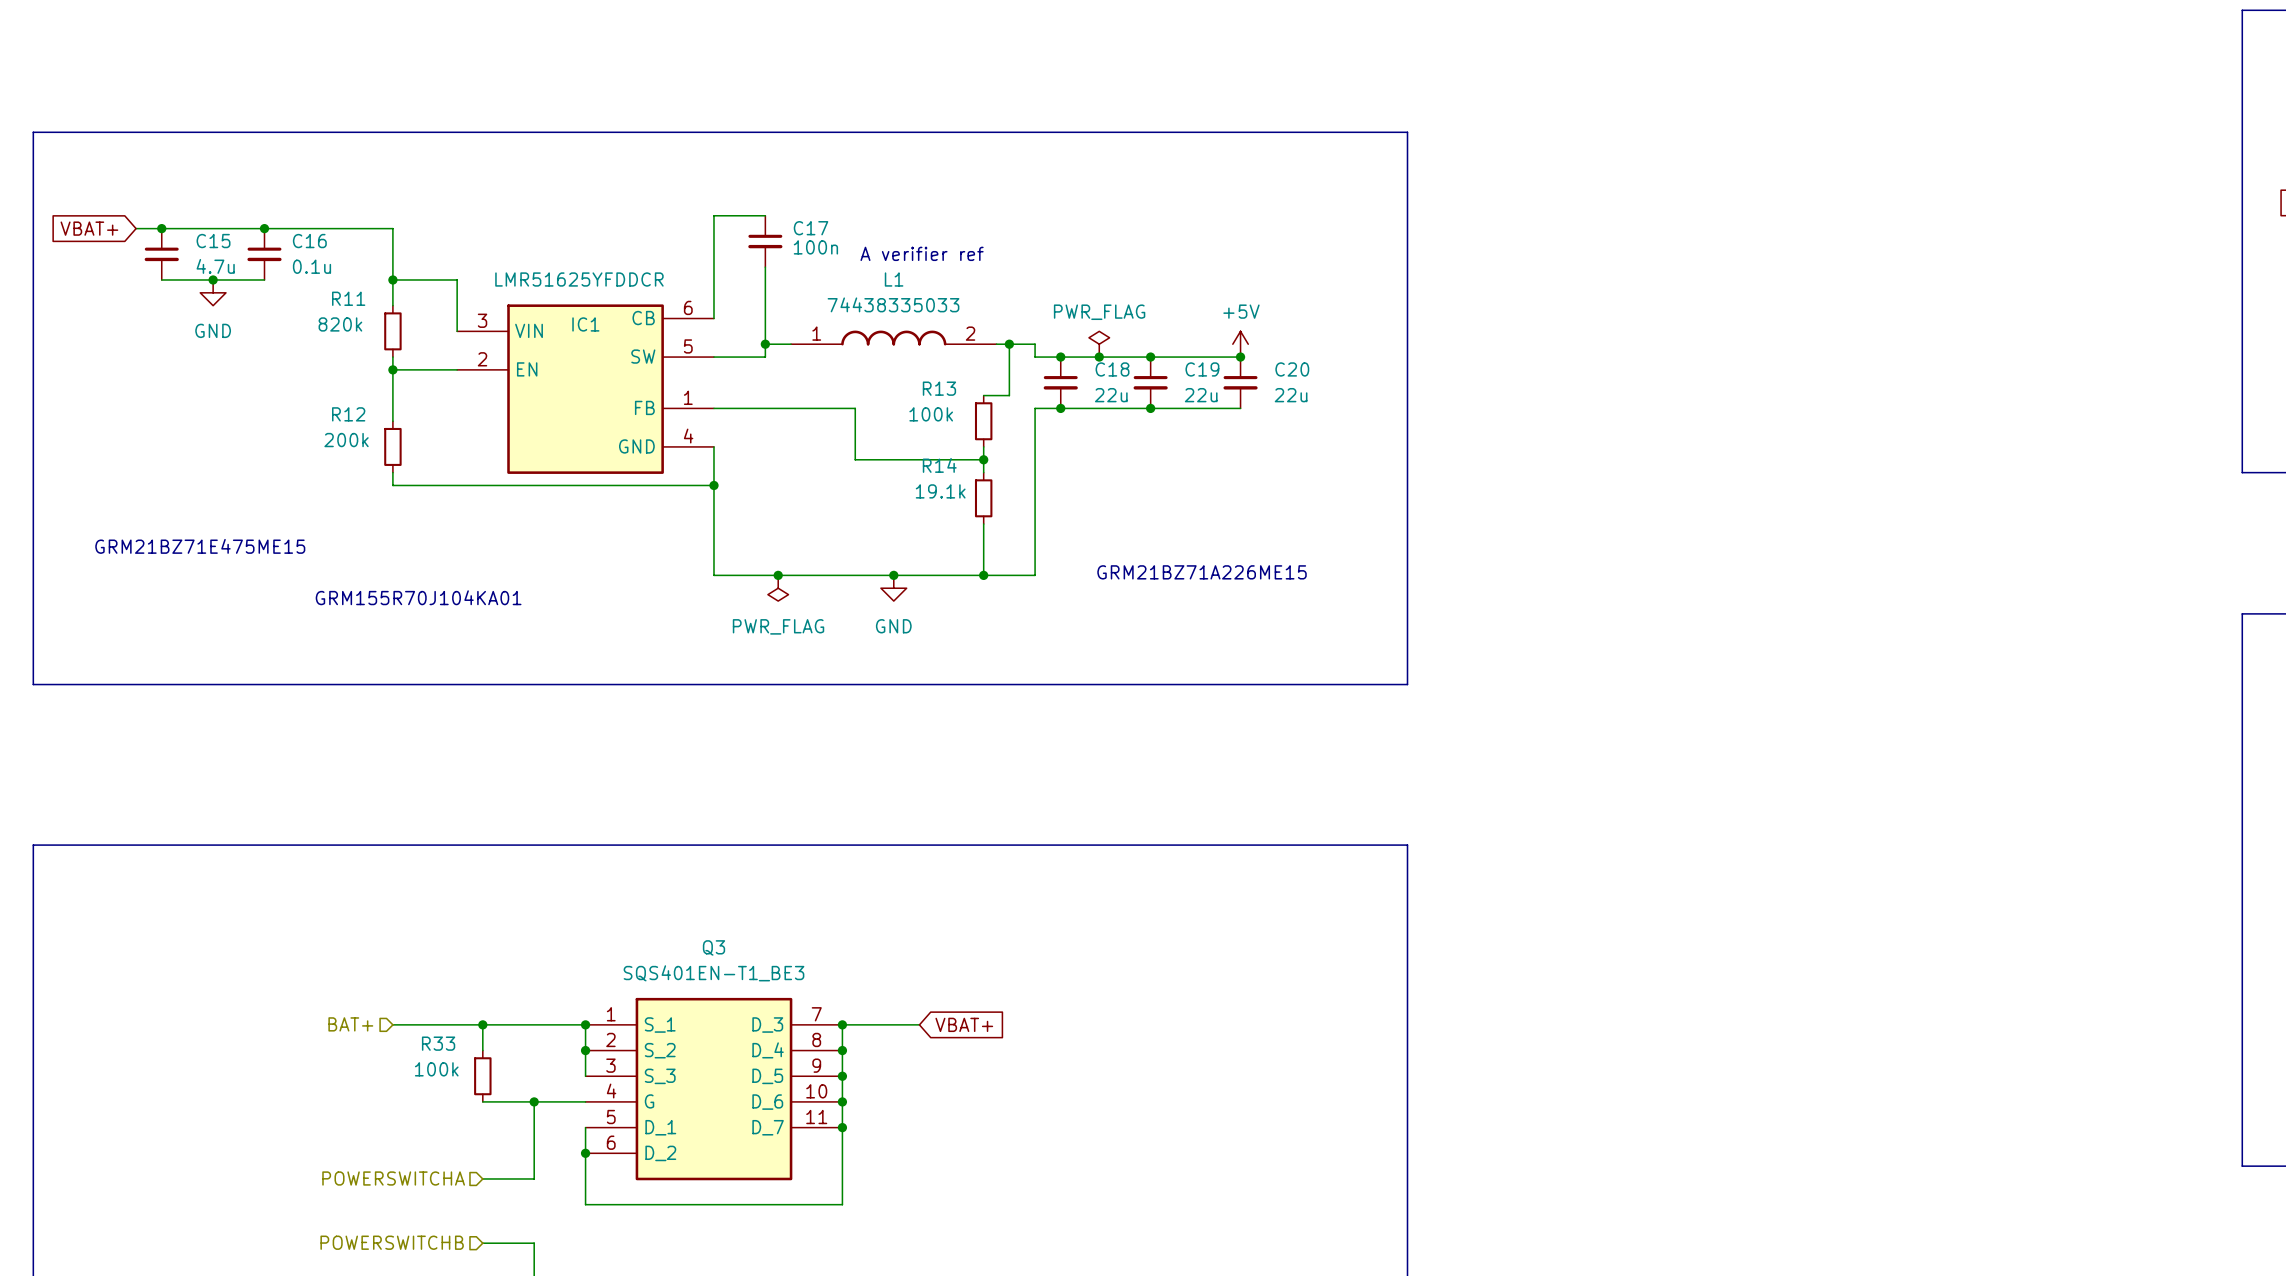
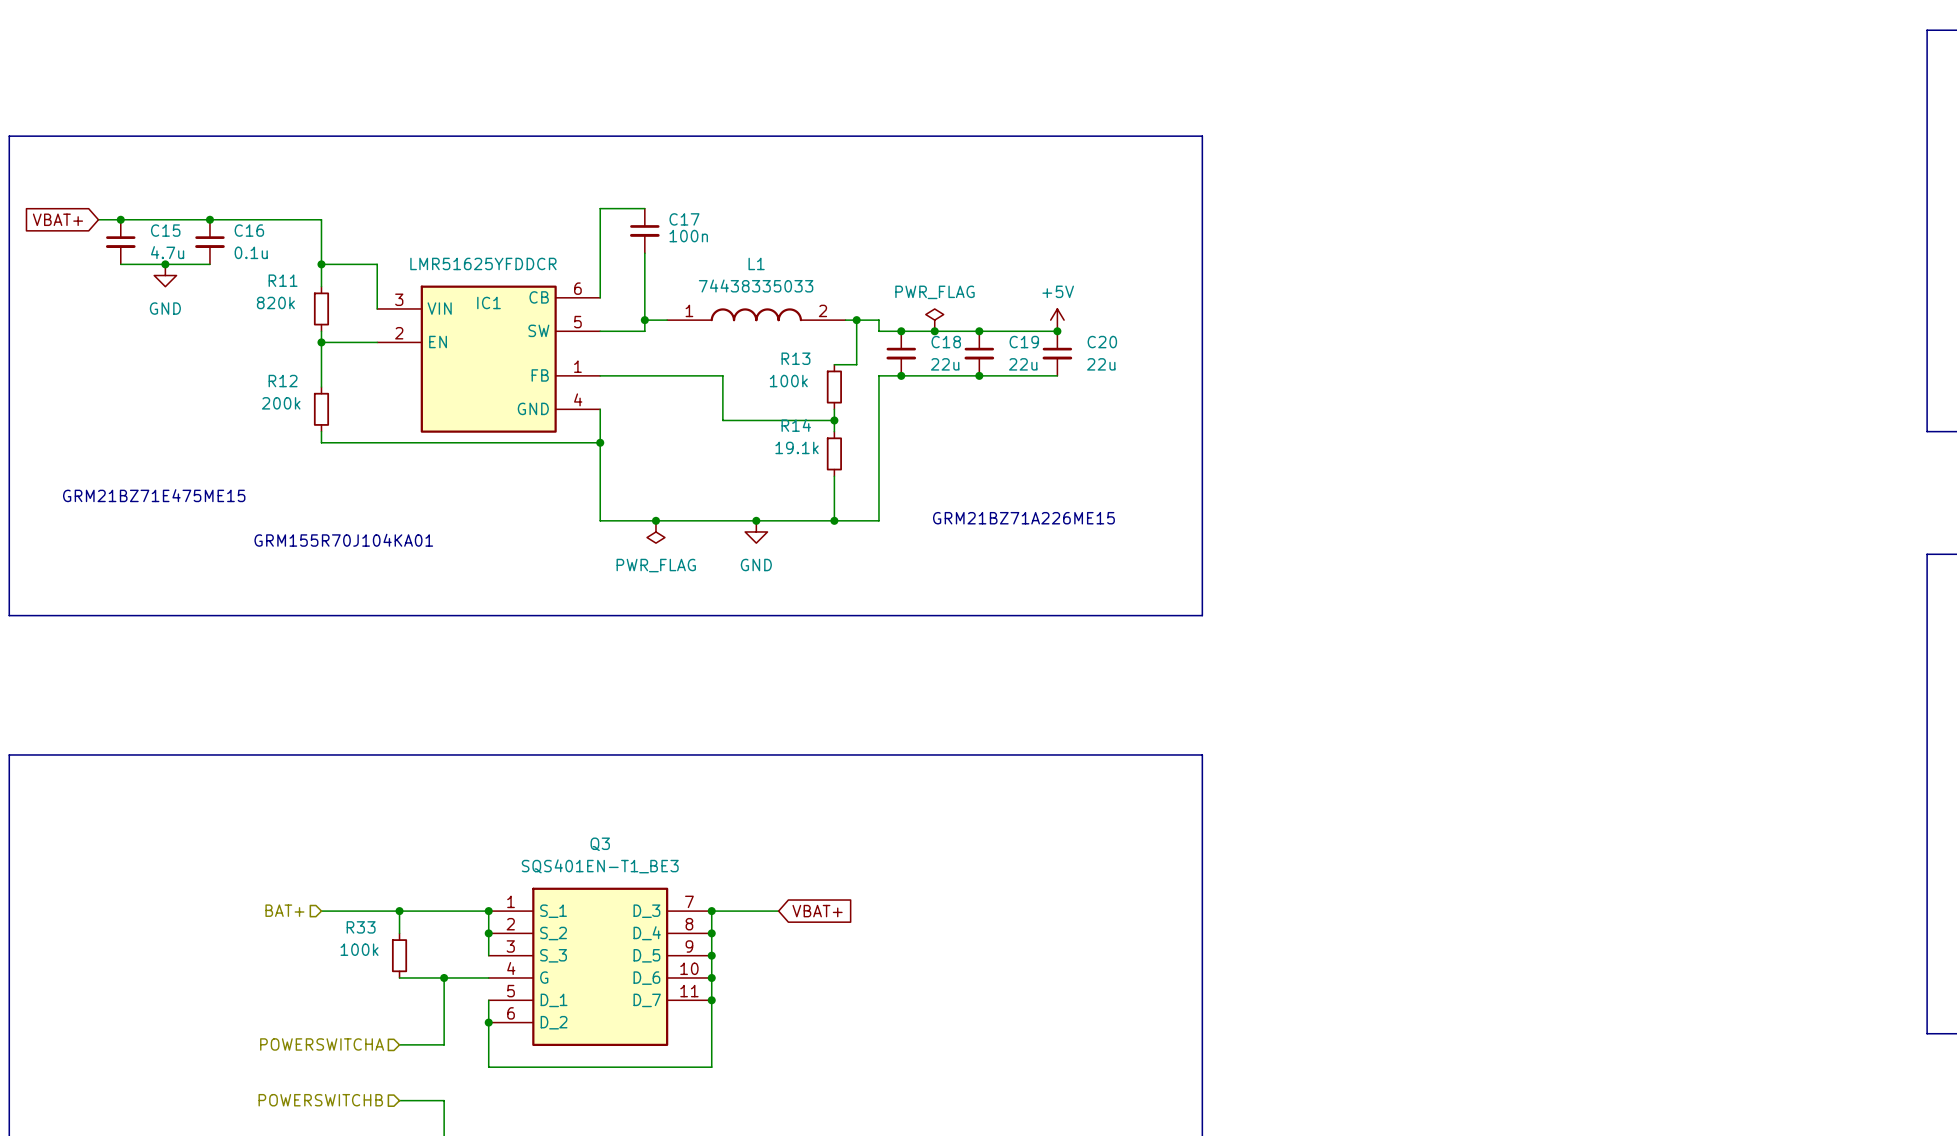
text: A verifier ref (922, 253) -> none

